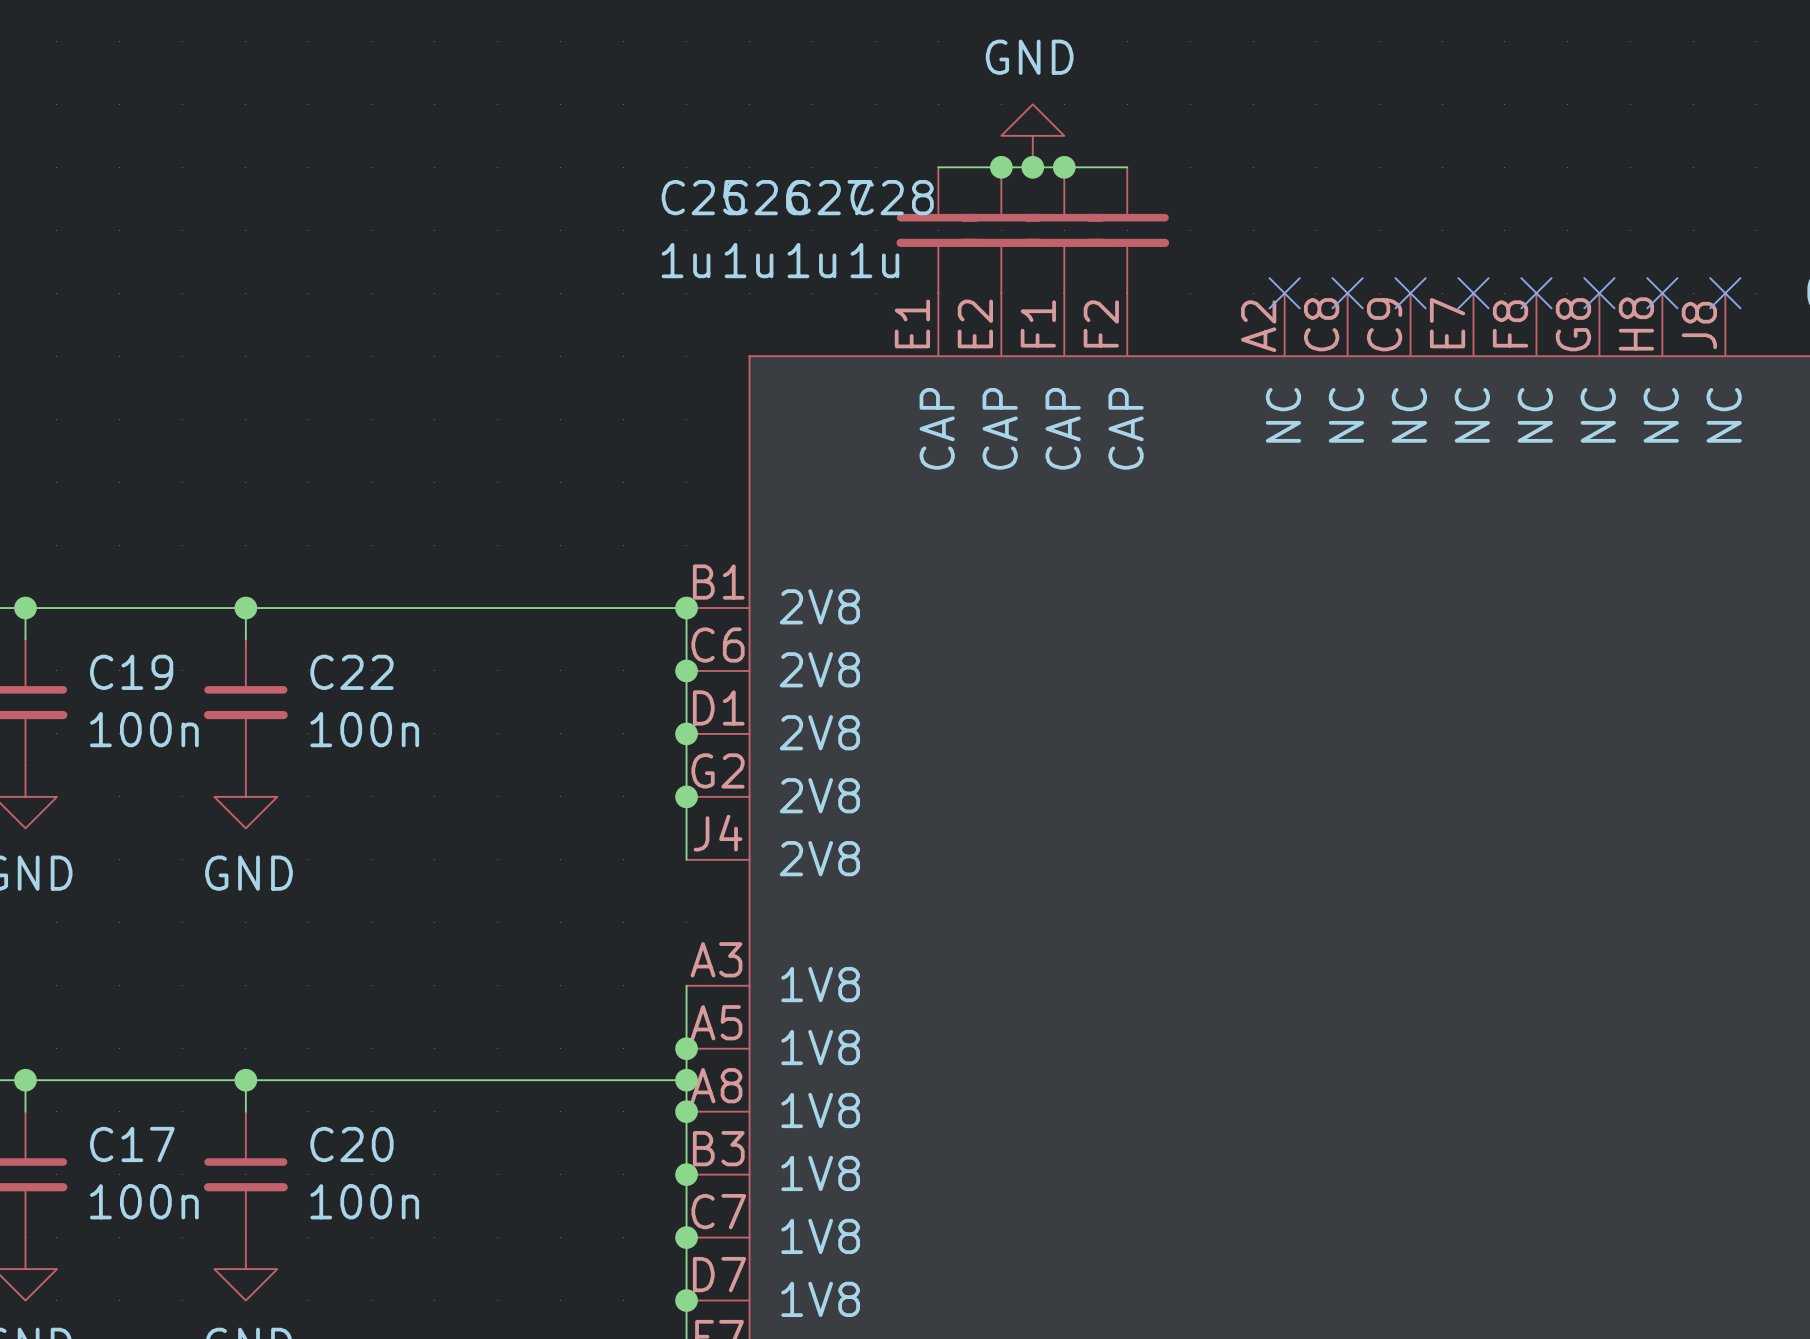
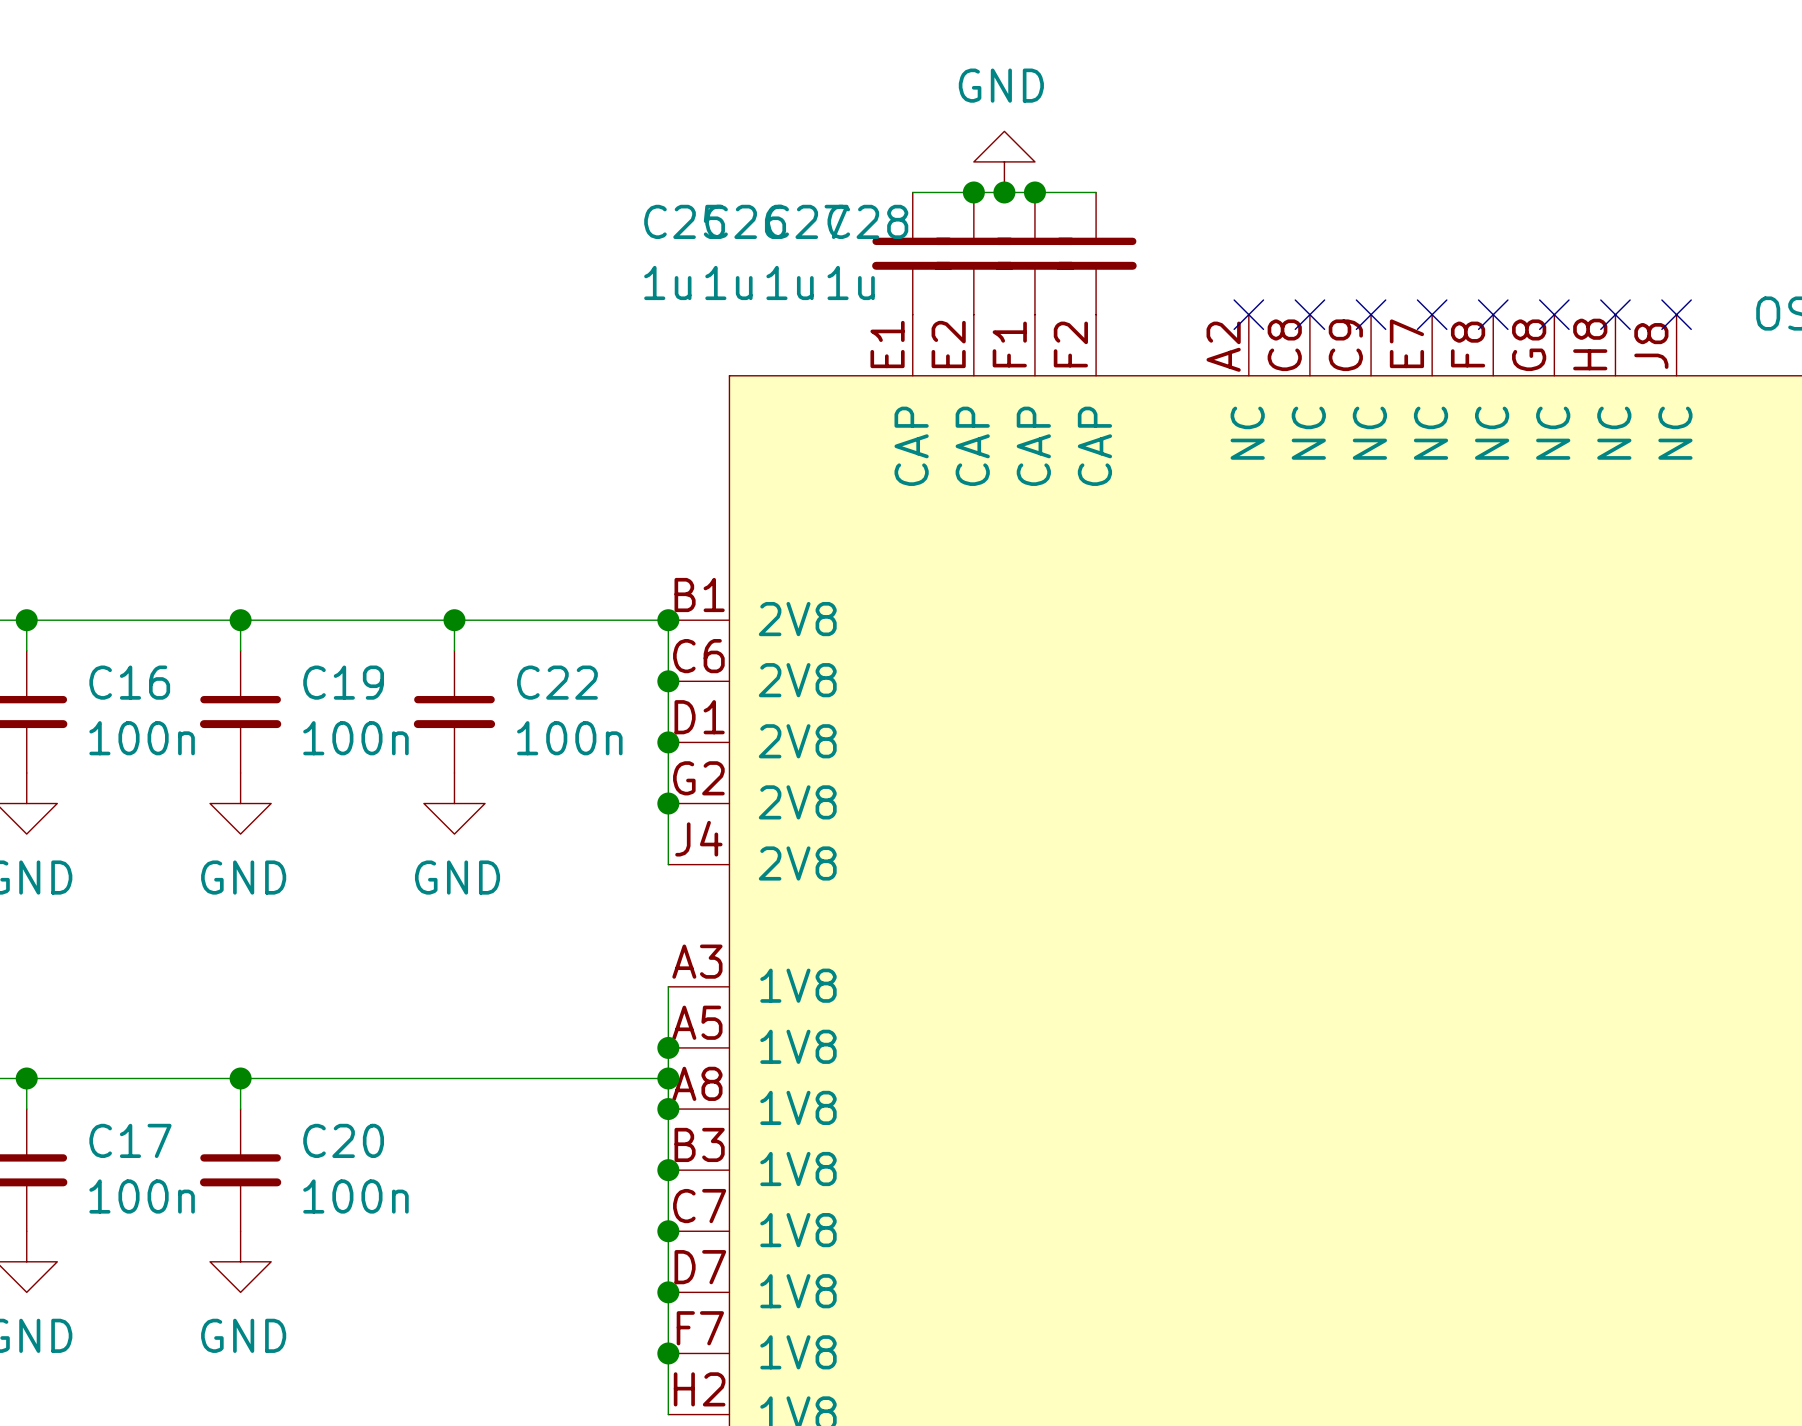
wire: none -> (454, 620) (454, 650)
junction: none -> (454, 620)
C19 name: C19 (131, 672) -> C16 (129, 682)
C22 name: C22 (351, 672) -> C19 (343, 682)
C22: none -> 100n (454, 711)
power symbol: none -> GND (454, 803)

